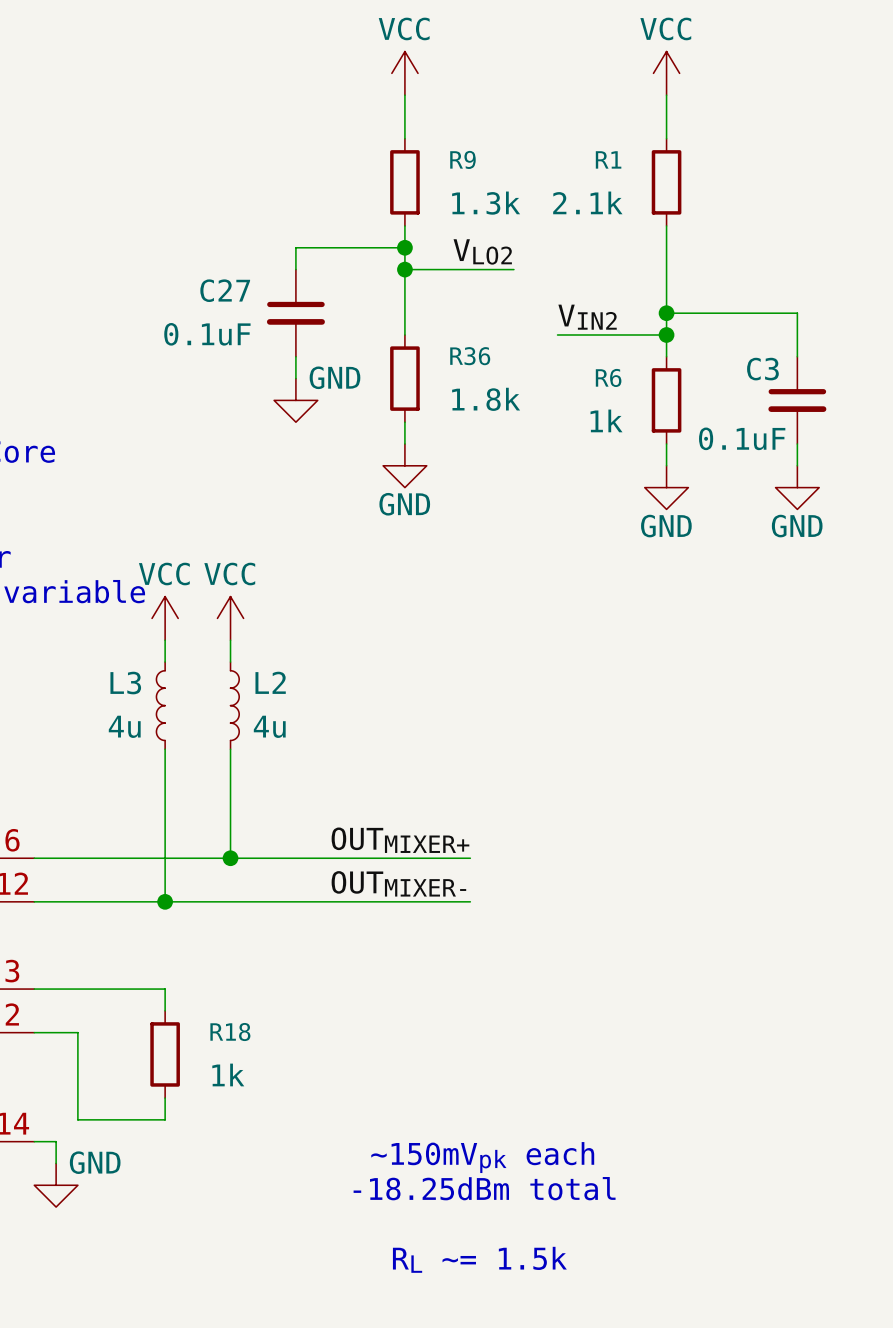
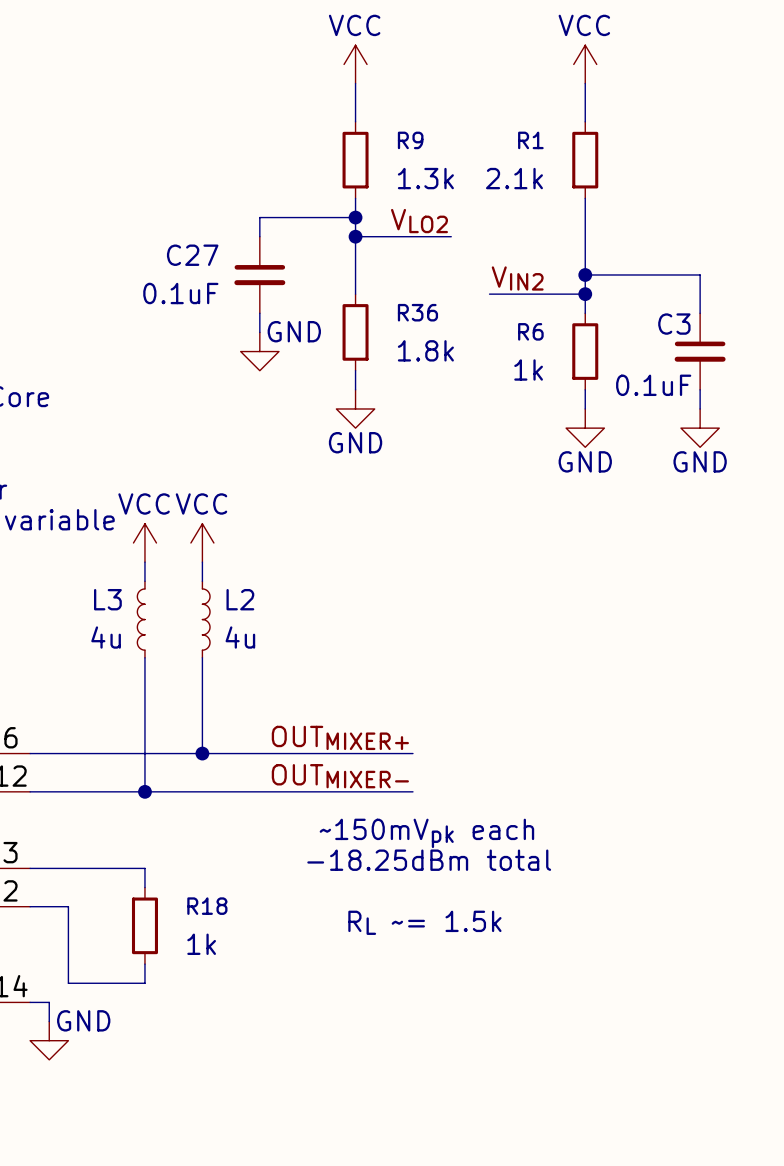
text position: ~150mVpk each (482, 1157) -> ~150mVpk each (426, 833)
text position: -18.25dBm total (484, 1188) -> -18.25dBm total (429, 860)
text position: RL ~= 1.5k (479, 1259) -> RL ~= 1.5k (424, 922)

